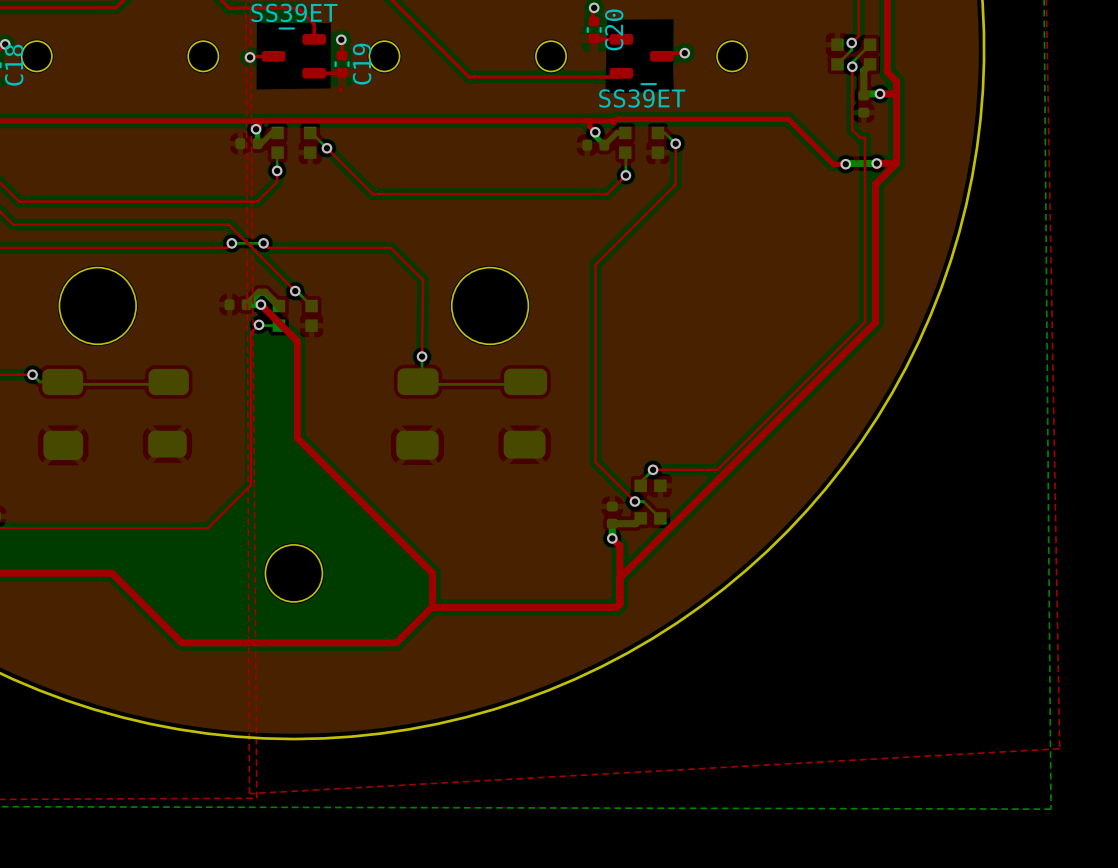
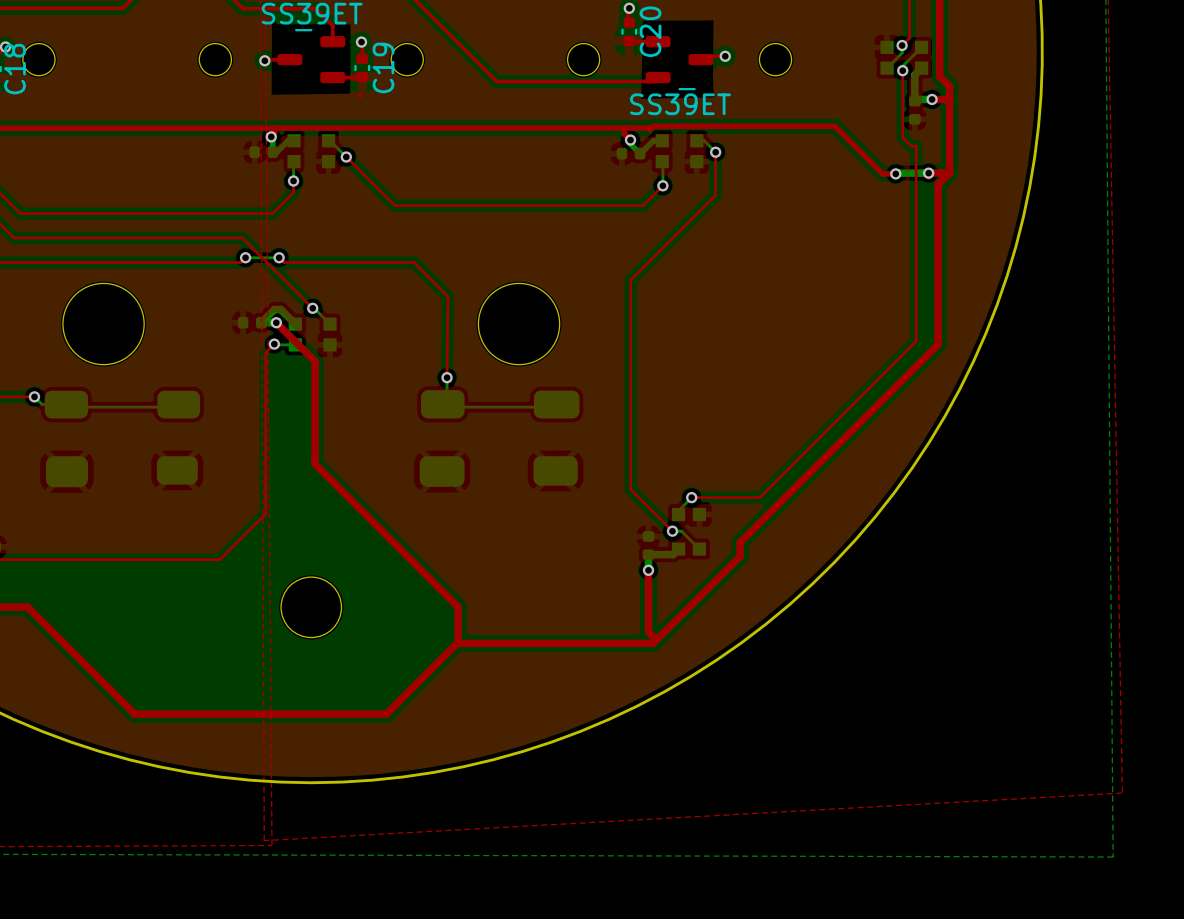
top track: (885, 174) (875, 184) (875, 322) (619, 578) -> (938, 184) (938, 344) (740, 542) (740, 556) (656, 640) (648, 631) (648, 570)
top track: (612, 538) (619, 546) (619, 604) -> none
top track: (26, 573) (112, 573) (181, 642) (396, 642) -> (27, 607) (134, 714) (386, 714) (419, 680)

